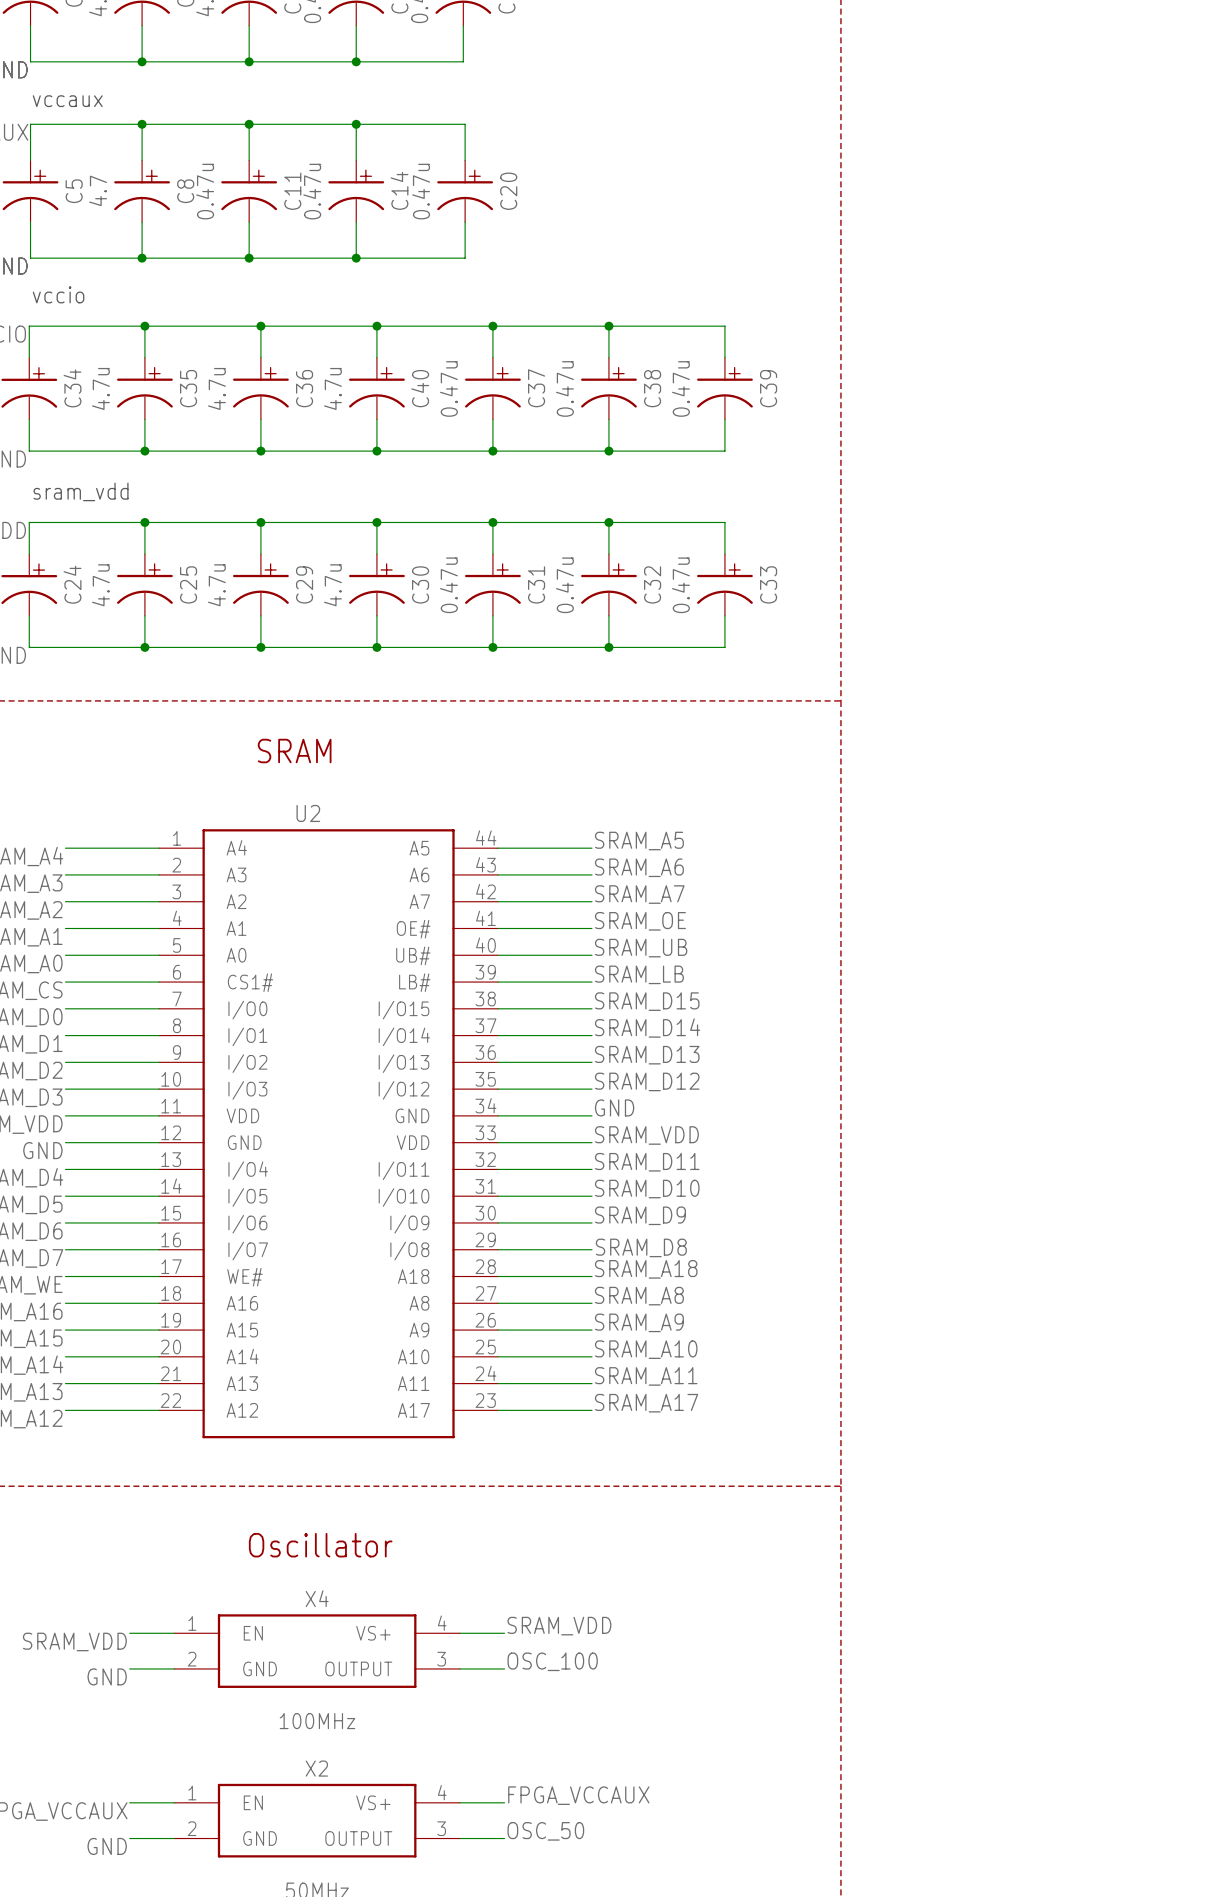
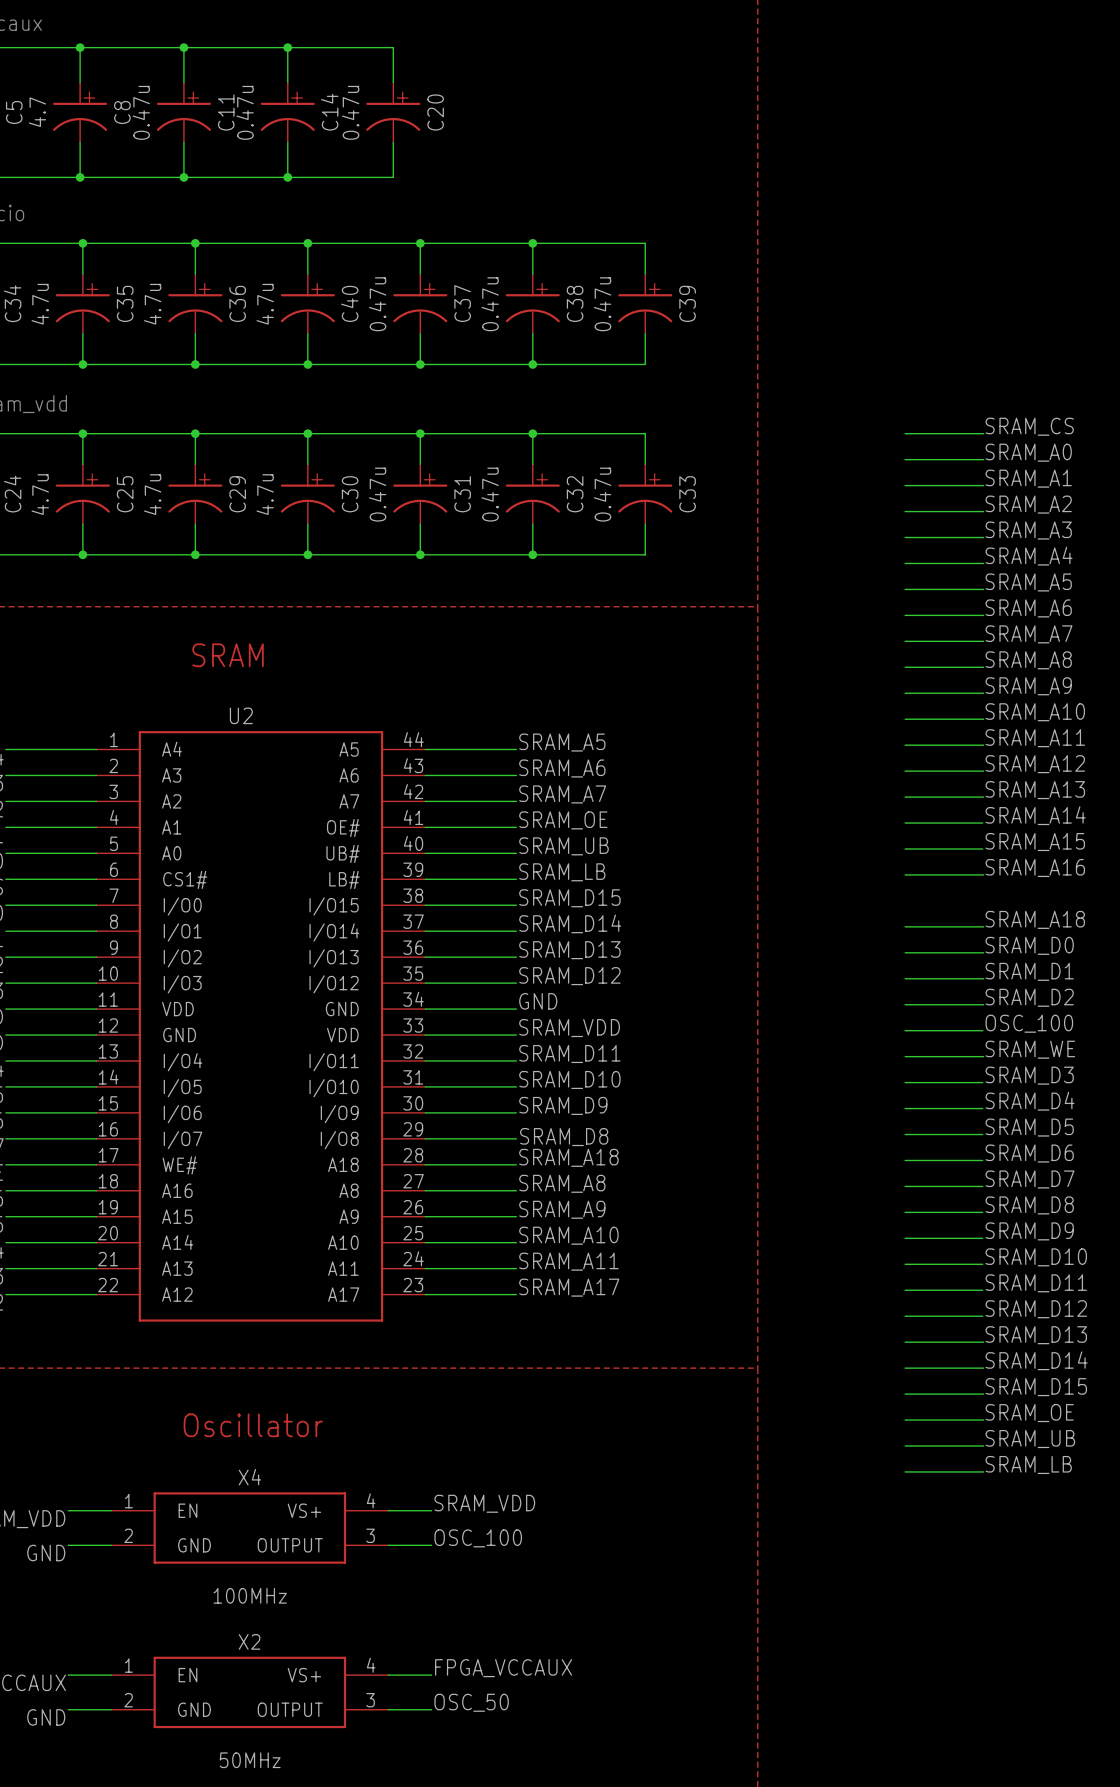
label: none -> SRAM_CS (1029, 426)
wire: none -> (905, 433) (983, 433)
label: none -> SRAM_A0 (1028, 452)
wire: none -> (905, 459) (983, 459)
label: none -> SRAM_A1 (1028, 478)
wire: none -> (905, 485) (983, 485)
label: none -> SRAM_A2 (1028, 504)
wire: none -> (905, 511) (983, 511)
label: none -> SRAM_A3 (1028, 530)
wire: none -> (905, 537) (983, 537)
label: none -> SRAM_A4 (1029, 556)
wire: none -> (905, 563) (983, 563)
label: none -> SRAM_A5 (1028, 582)
wire: none -> (905, 589) (983, 589)
label: none -> SRAM_A6 (1028, 608)
wire: none -> (905, 615) (983, 615)
label: none -> SRAM_A7 (1029, 634)
wire: none -> (905, 641) (983, 641)
label: none -> SRAM_A8 (1028, 660)
wire: none -> (905, 667) (983, 667)
label: none -> SRAM_A9 (1028, 686)
wire: none -> (905, 693) (983, 693)
label: none -> SRAM_A10 (1035, 712)
wire: none -> (905, 719) (983, 719)
label: none -> SRAM_A11 (1035, 738)
wire: none -> (905, 745) (983, 745)
label: none -> SRAM_A12 (1035, 764)
wire: none -> (905, 771) (983, 771)
label: none -> SRAM_A13 (1035, 790)
wire: none -> (905, 797) (983, 797)
label: none -> SRAM_A14 (1035, 815)
wire: none -> (905, 823) (982, 823)
label: none -> SRAM_A15 (1035, 842)
wire: none -> (905, 848) (982, 848)
label: none -> SRAM_A16 (1035, 867)
wire: none -> (905, 874) (983, 874)
label: none -> SRAM_A18 (1035, 919)
wire: none -> (905, 926) (983, 926)
label: none -> SRAM_D0 (1029, 945)
wire: none -> (905, 952) (983, 952)
label: none -> SRAM_D1 (1029, 971)
wire: none -> (905, 978) (983, 978)
label: none -> SRAM_D2 (1029, 997)
wire: none -> (905, 1004) (983, 1004)
label: none -> OSC_100 (1029, 1023)
wire: none -> (905, 1030) (982, 1030)
label: none -> SRAM_WE (1030, 1049)
wire: none -> (905, 1056) (983, 1056)
label: none -> SRAM_D3 (1029, 1075)
wire: none -> (905, 1082) (982, 1082)
label: none -> SRAM_D4 (1030, 1101)
wire: none -> (905, 1108) (982, 1108)
label: none -> SRAM_D5 (1029, 1127)
wire: none -> (905, 1134) (982, 1134)
label: none -> SRAM_D6 (1029, 1153)
wire: none -> (905, 1160) (982, 1160)
label: none -> SRAM_D7 (1030, 1179)
wire: none -> (905, 1186) (982, 1186)
label: none -> SRAM_D8 (1029, 1205)
wire: none -> (905, 1212) (982, 1212)
label: none -> SRAM_D9 (1029, 1231)
wire: none -> (905, 1238) (982, 1238)
label: none -> SRAM_D10 (1036, 1257)
wire: none -> (905, 1264) (982, 1264)
label: none -> SRAM_D11 (1036, 1283)
wire: none -> (905, 1290) (982, 1290)
label: none -> SRAM_D12 (1036, 1309)
wire: none -> (905, 1316) (982, 1316)
label: none -> SRAM_D13 (1036, 1335)
wire: none -> (905, 1342) (983, 1342)
label: none -> SRAM_D14 (1036, 1360)
wire: none -> (905, 1368) (983, 1368)
label: none -> SRAM_D15 (1036, 1387)
wire: none -> (905, 1394) (983, 1394)
label: none -> SRAM_OE (1029, 1413)
wire: none -> (905, 1420) (983, 1420)
label: none -> SRAM_UB (1030, 1439)
wire: none -> (905, 1446) (983, 1446)
label: none -> SRAM_LB (1028, 1465)
wire: none -> (905, 1471) (983, 1471)

